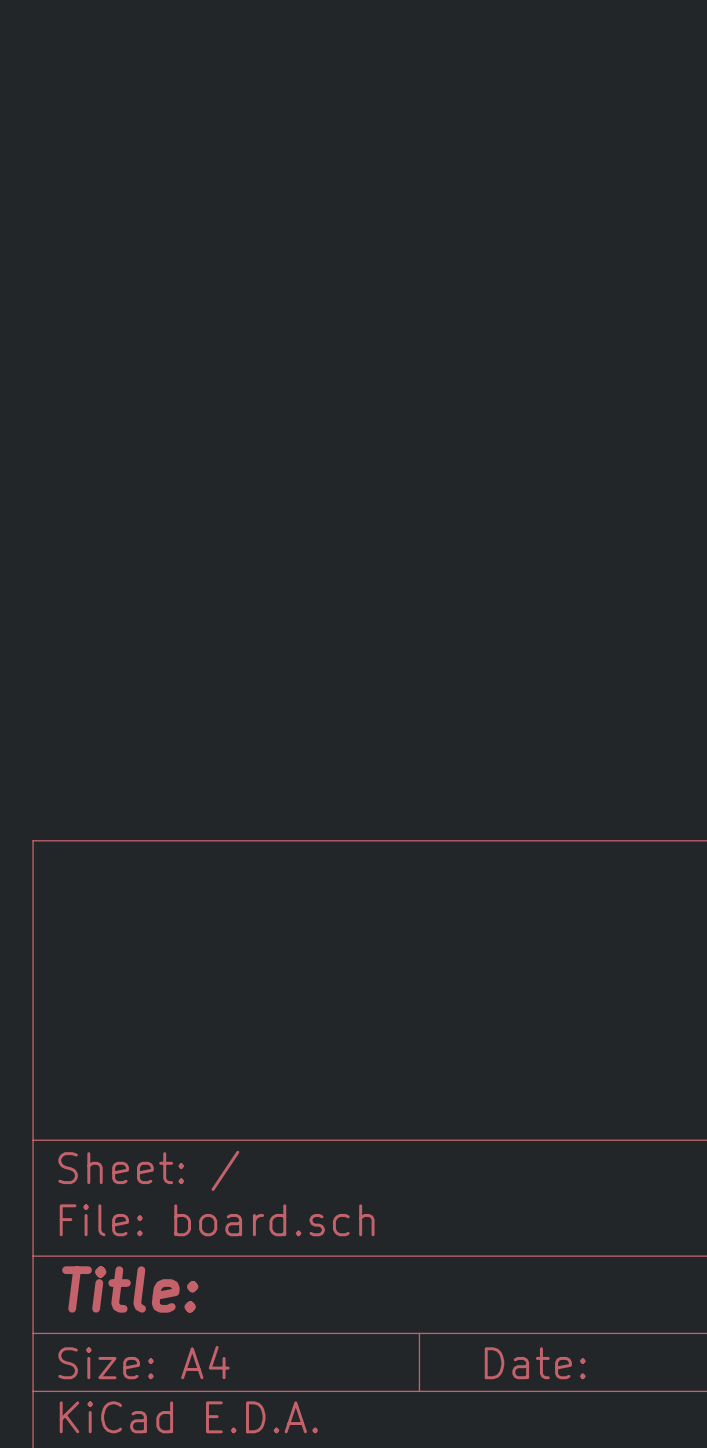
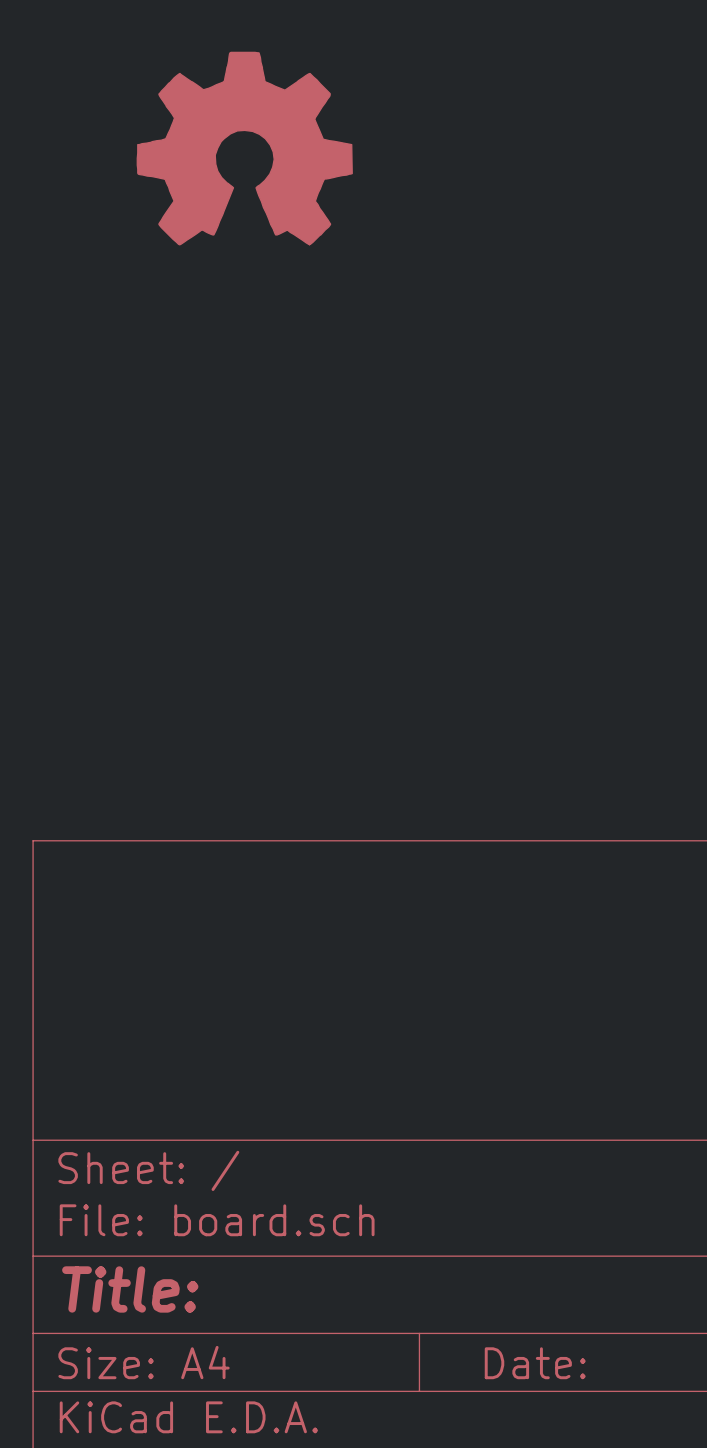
part: none -> (244, 148)

